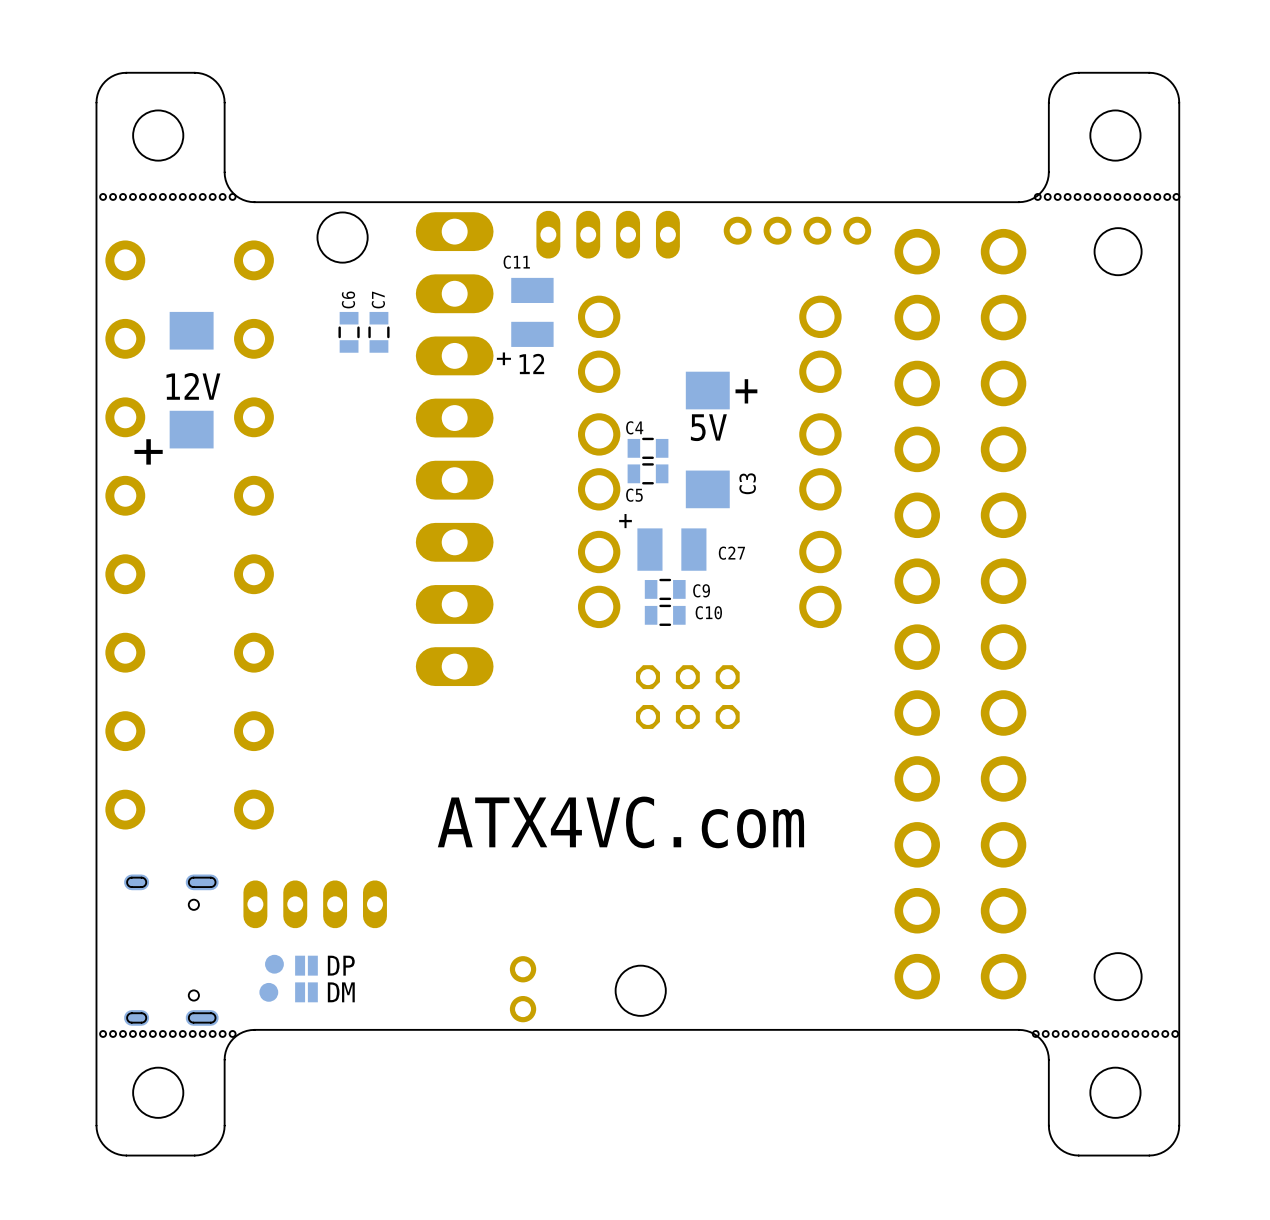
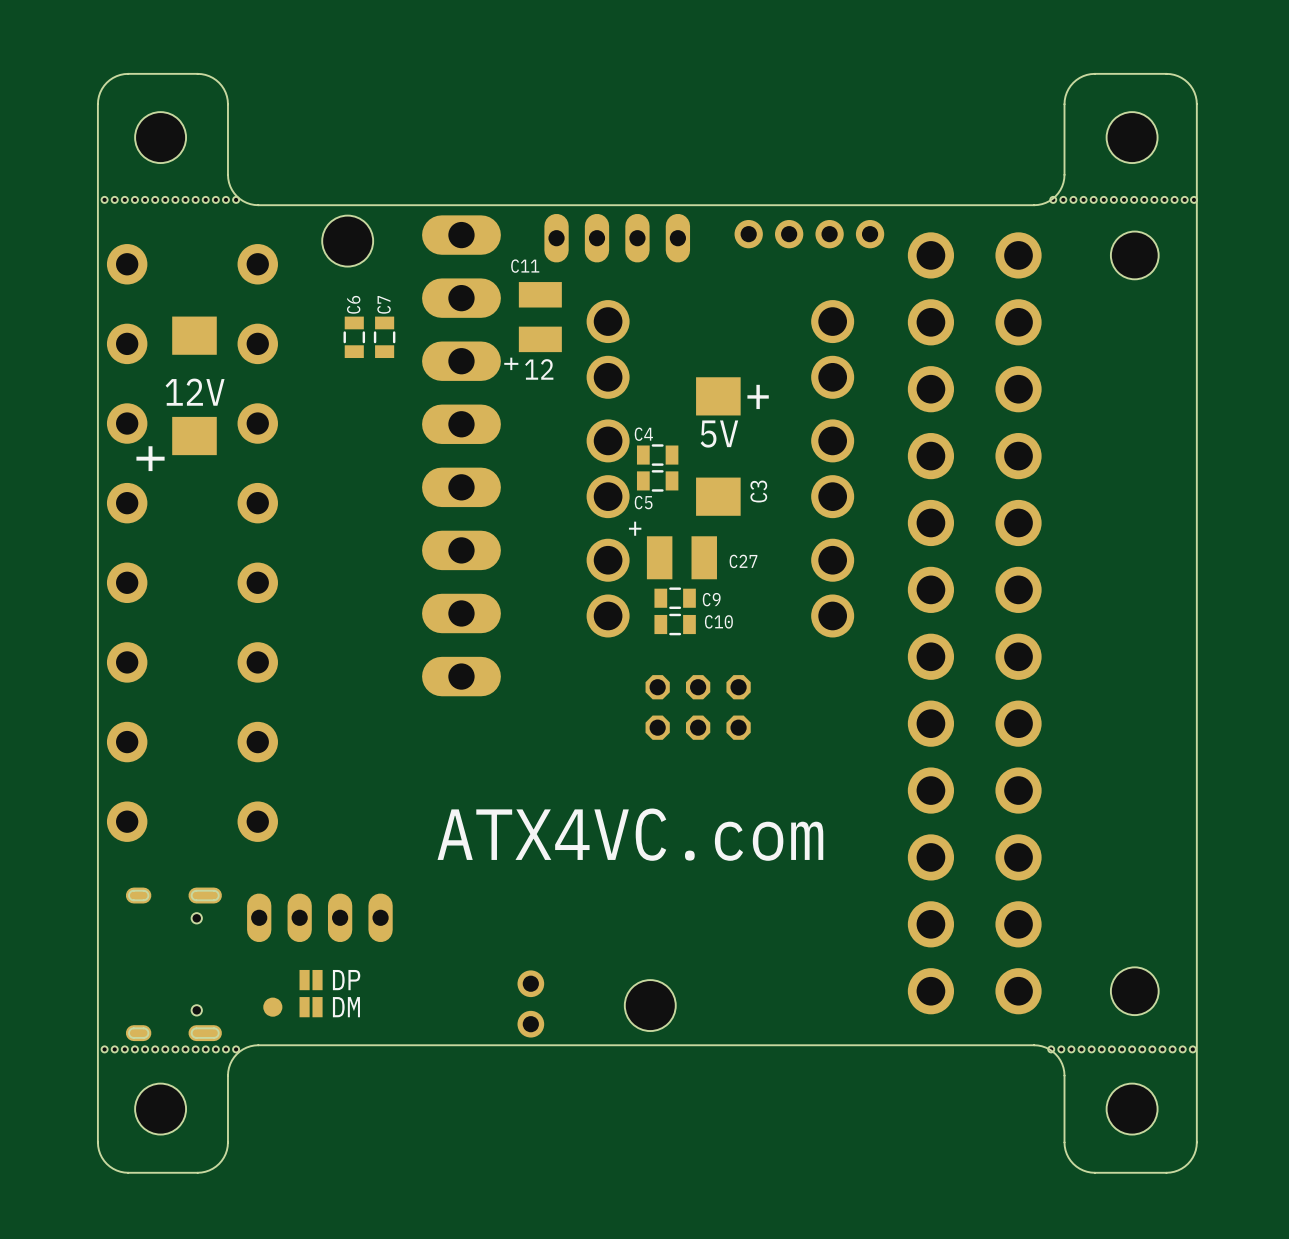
part: (274, 964) -> none

